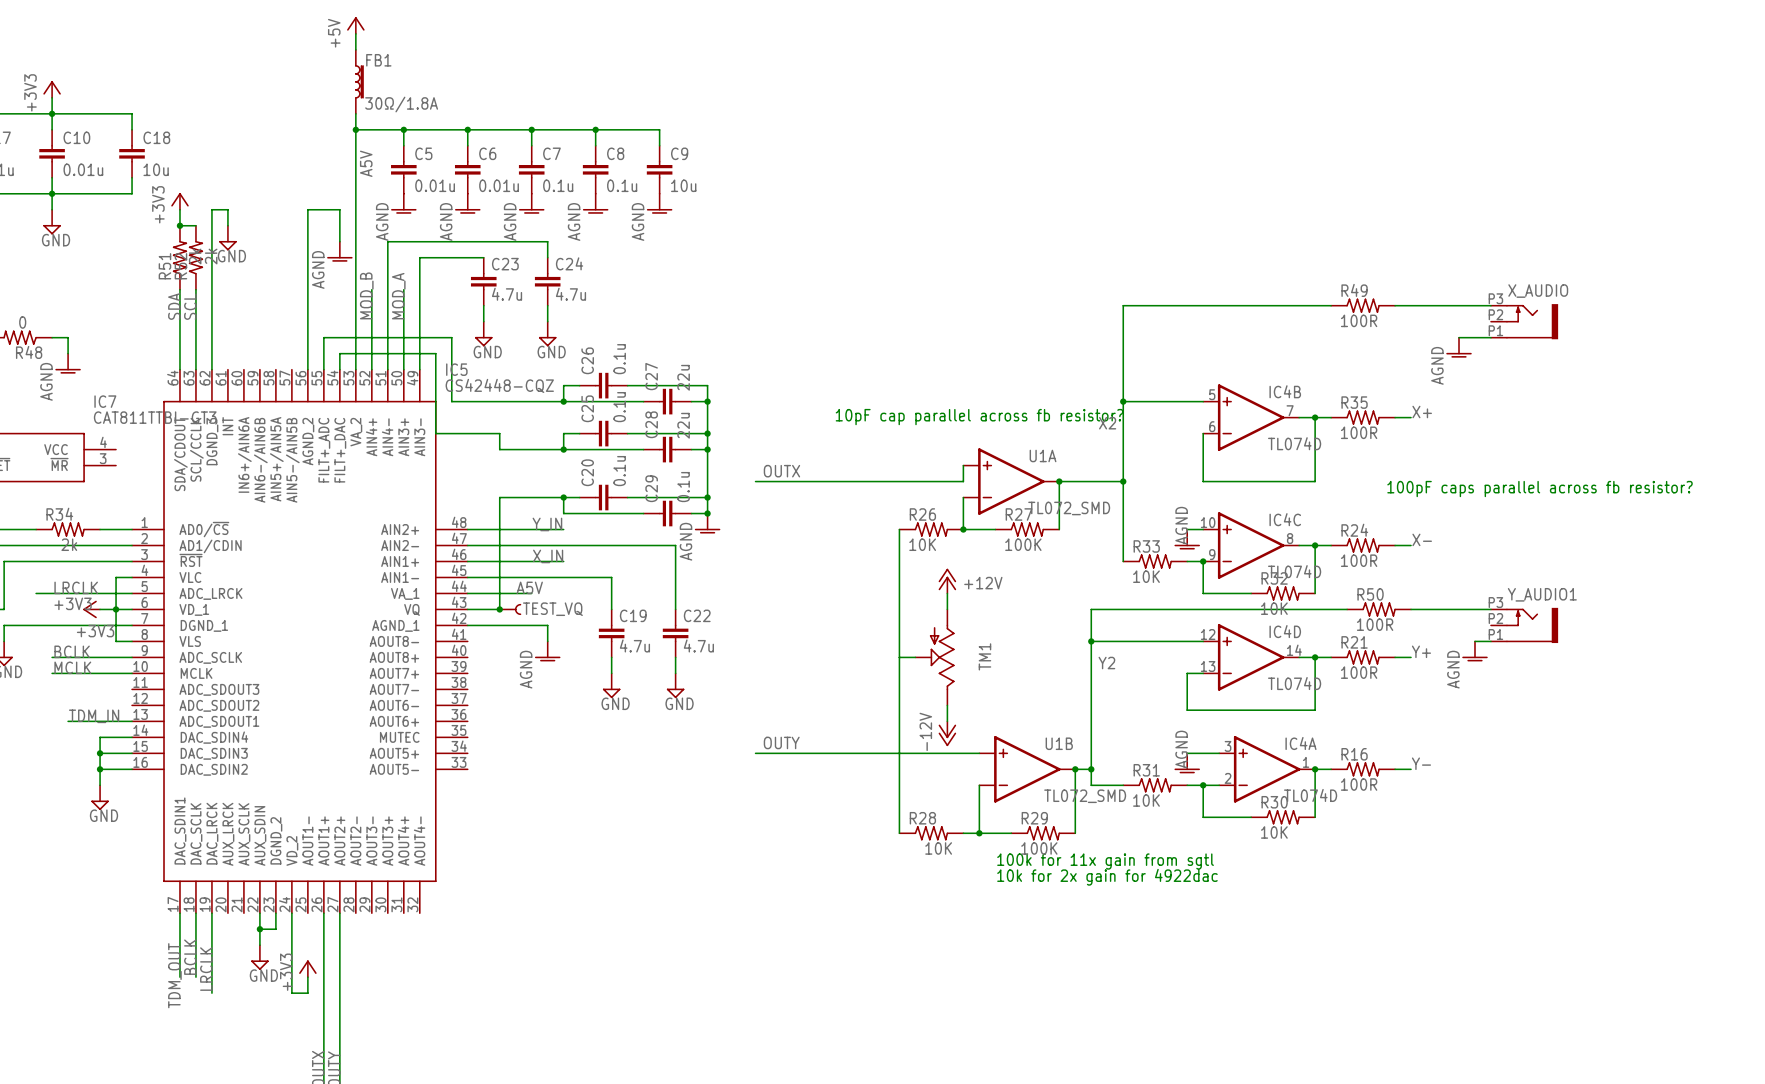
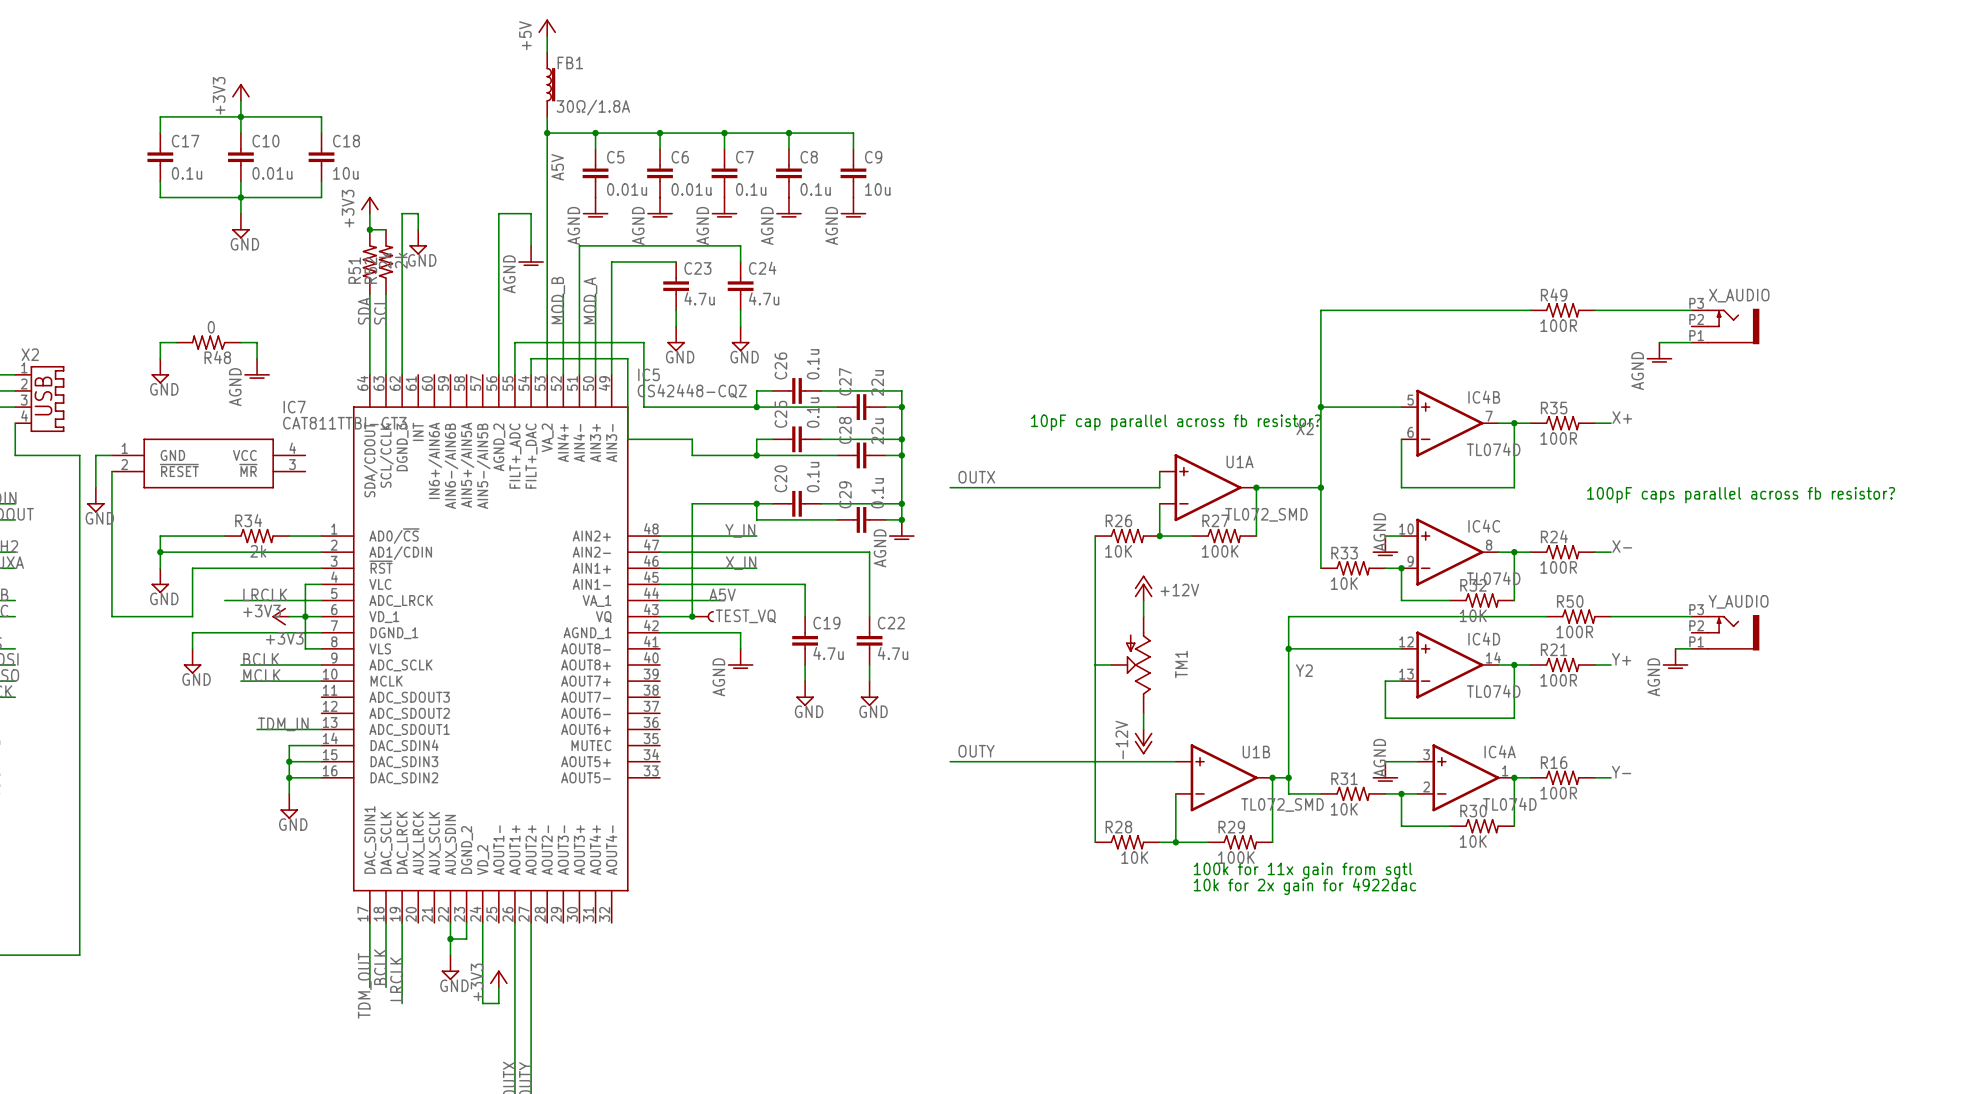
Y_AUDIO1 name: Y_AUDIO1 (1542, 594) -> Y_AUDIO (1738, 601)

